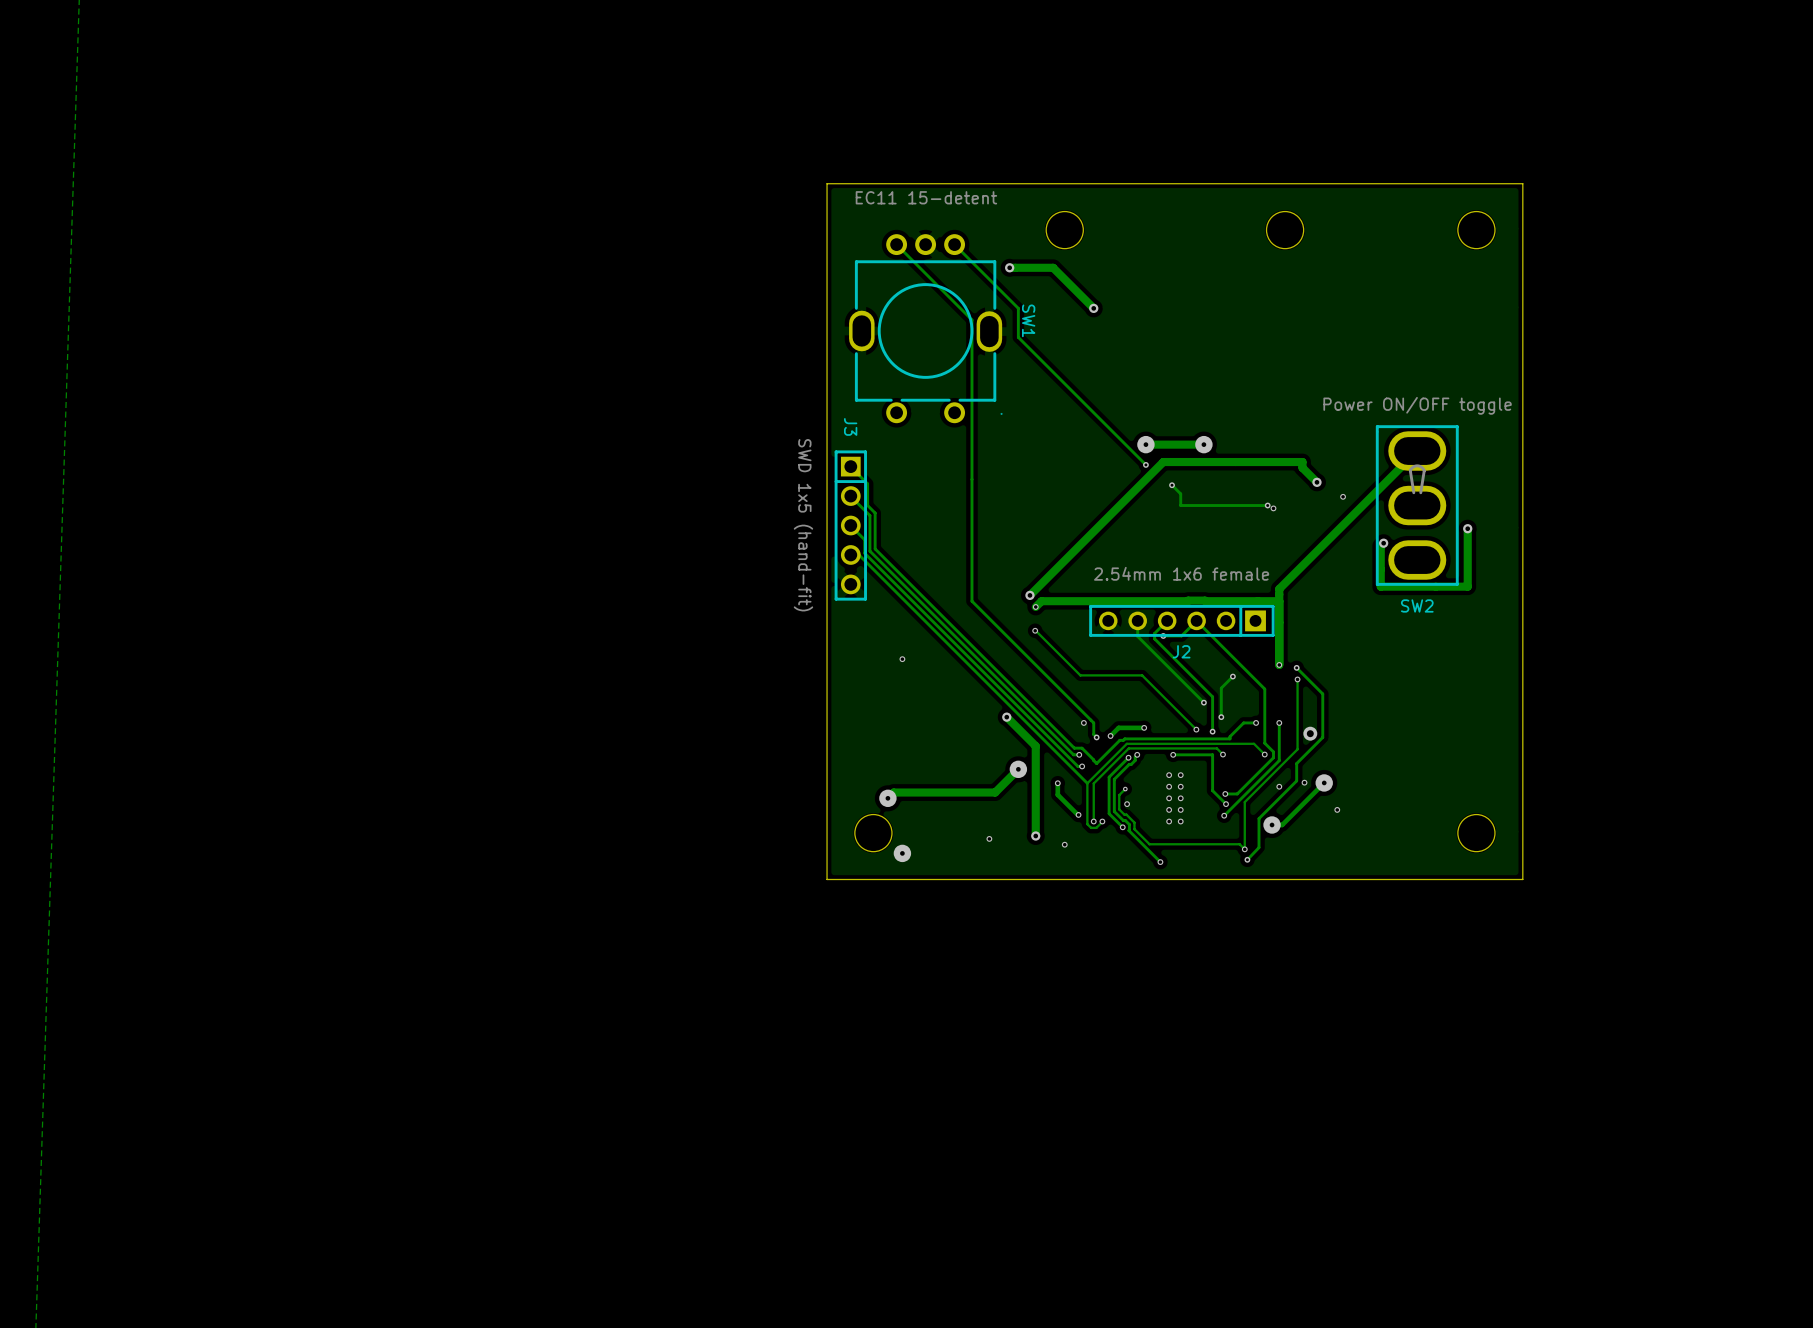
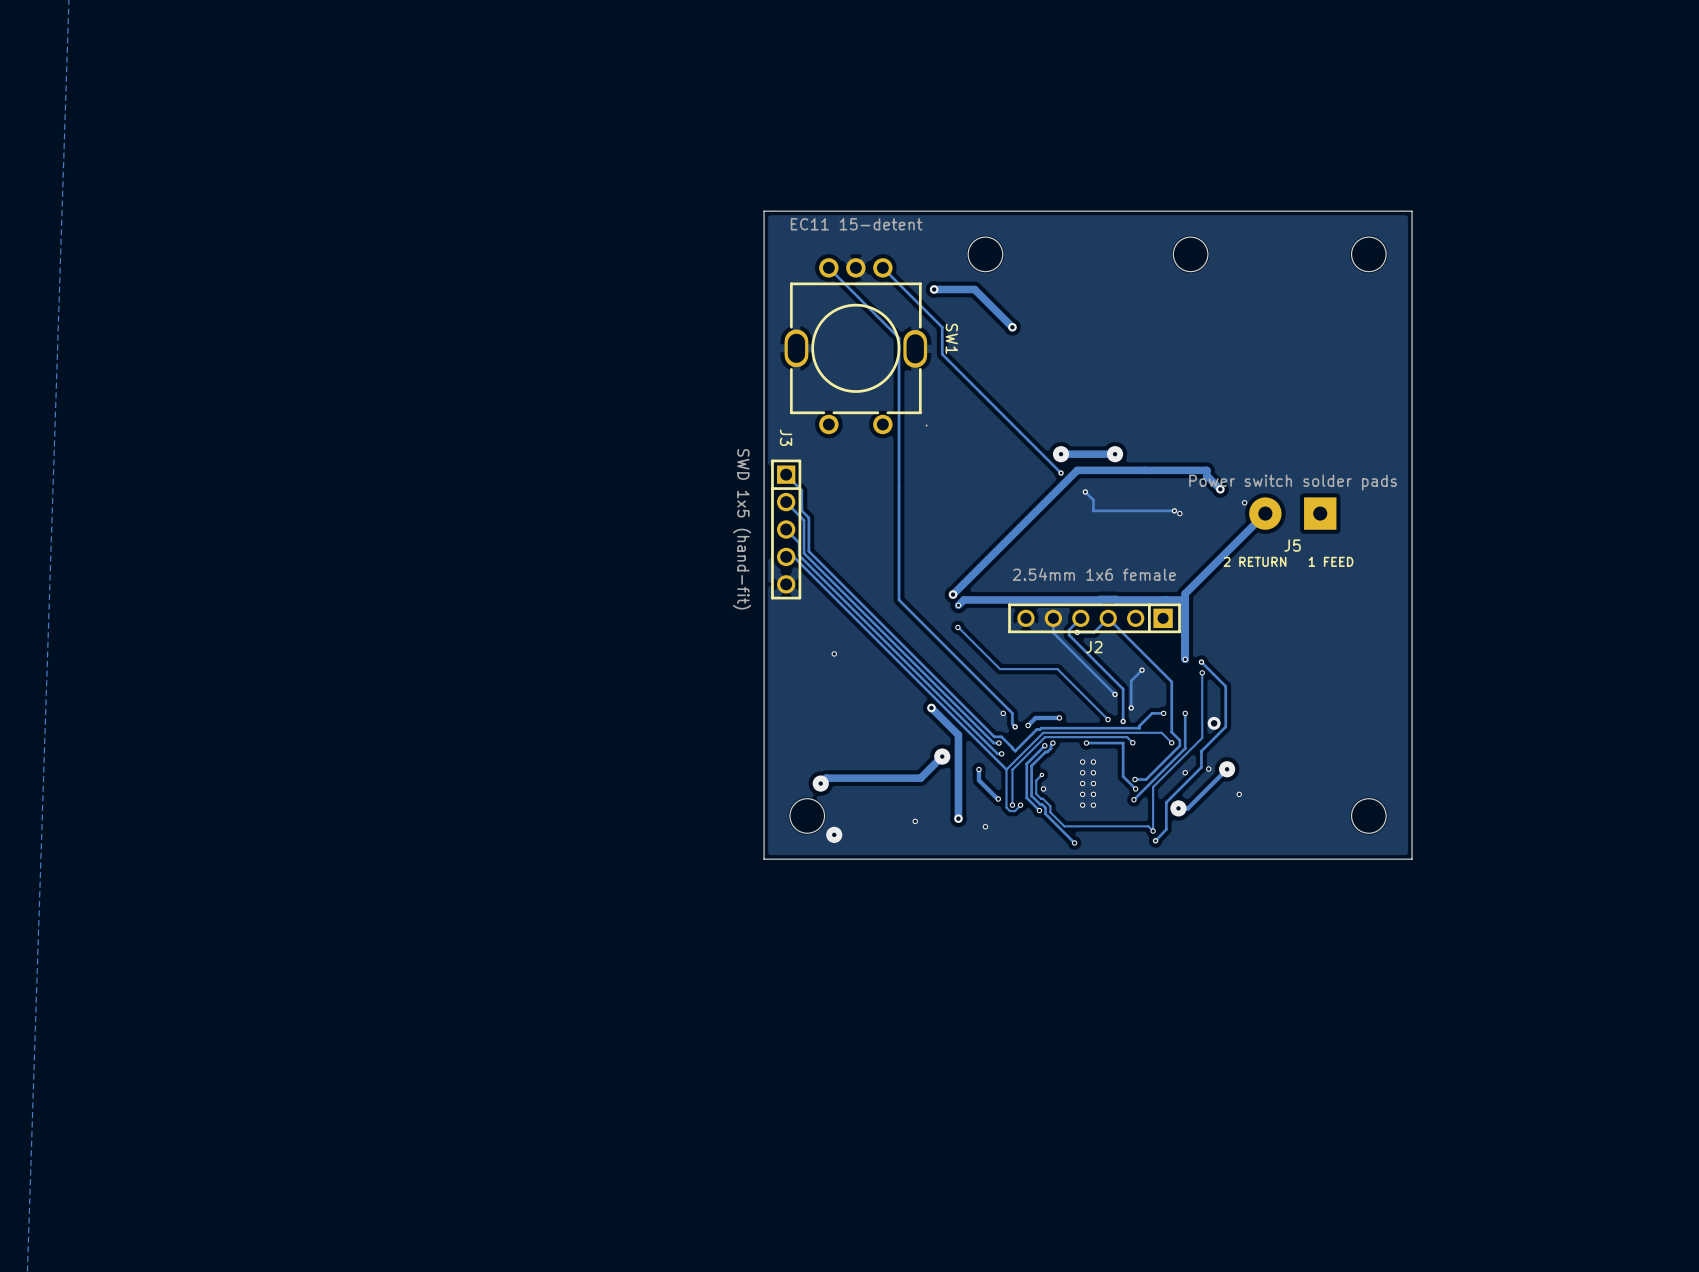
track: (1417, 451) (1279, 589) (1279, 594) -> (1265, 513) (1185, 593)
SW2: Power ON/OFF toggle (1417, 505) -> none
J5: none -> Power switch solder pads (1292, 513)
track: (1467, 528) (1467, 586) (1380, 586) (1380, 546) (1383, 543) -> none
via: (1467, 528) -> none
via: (1383, 543) -> none

